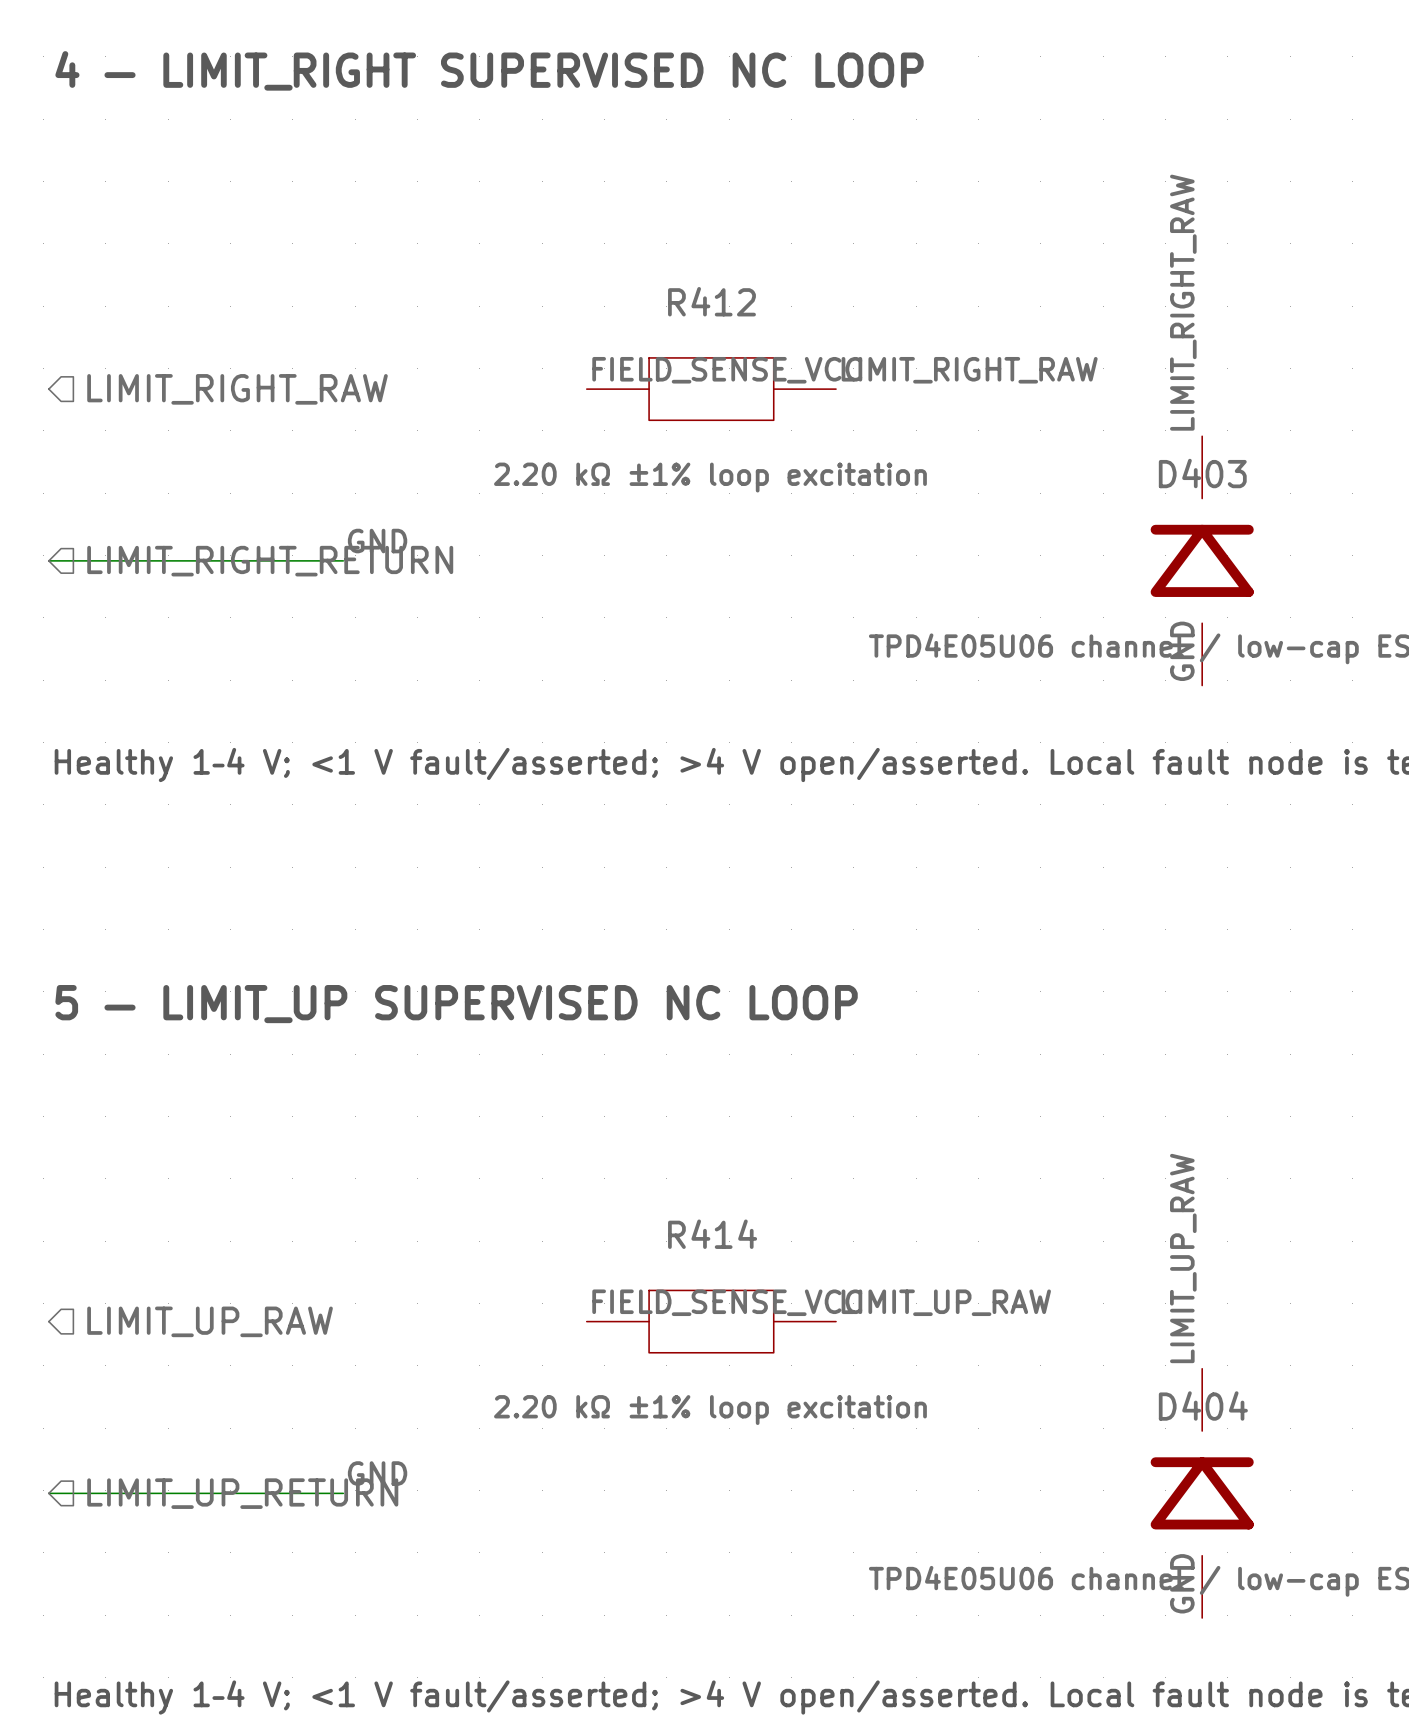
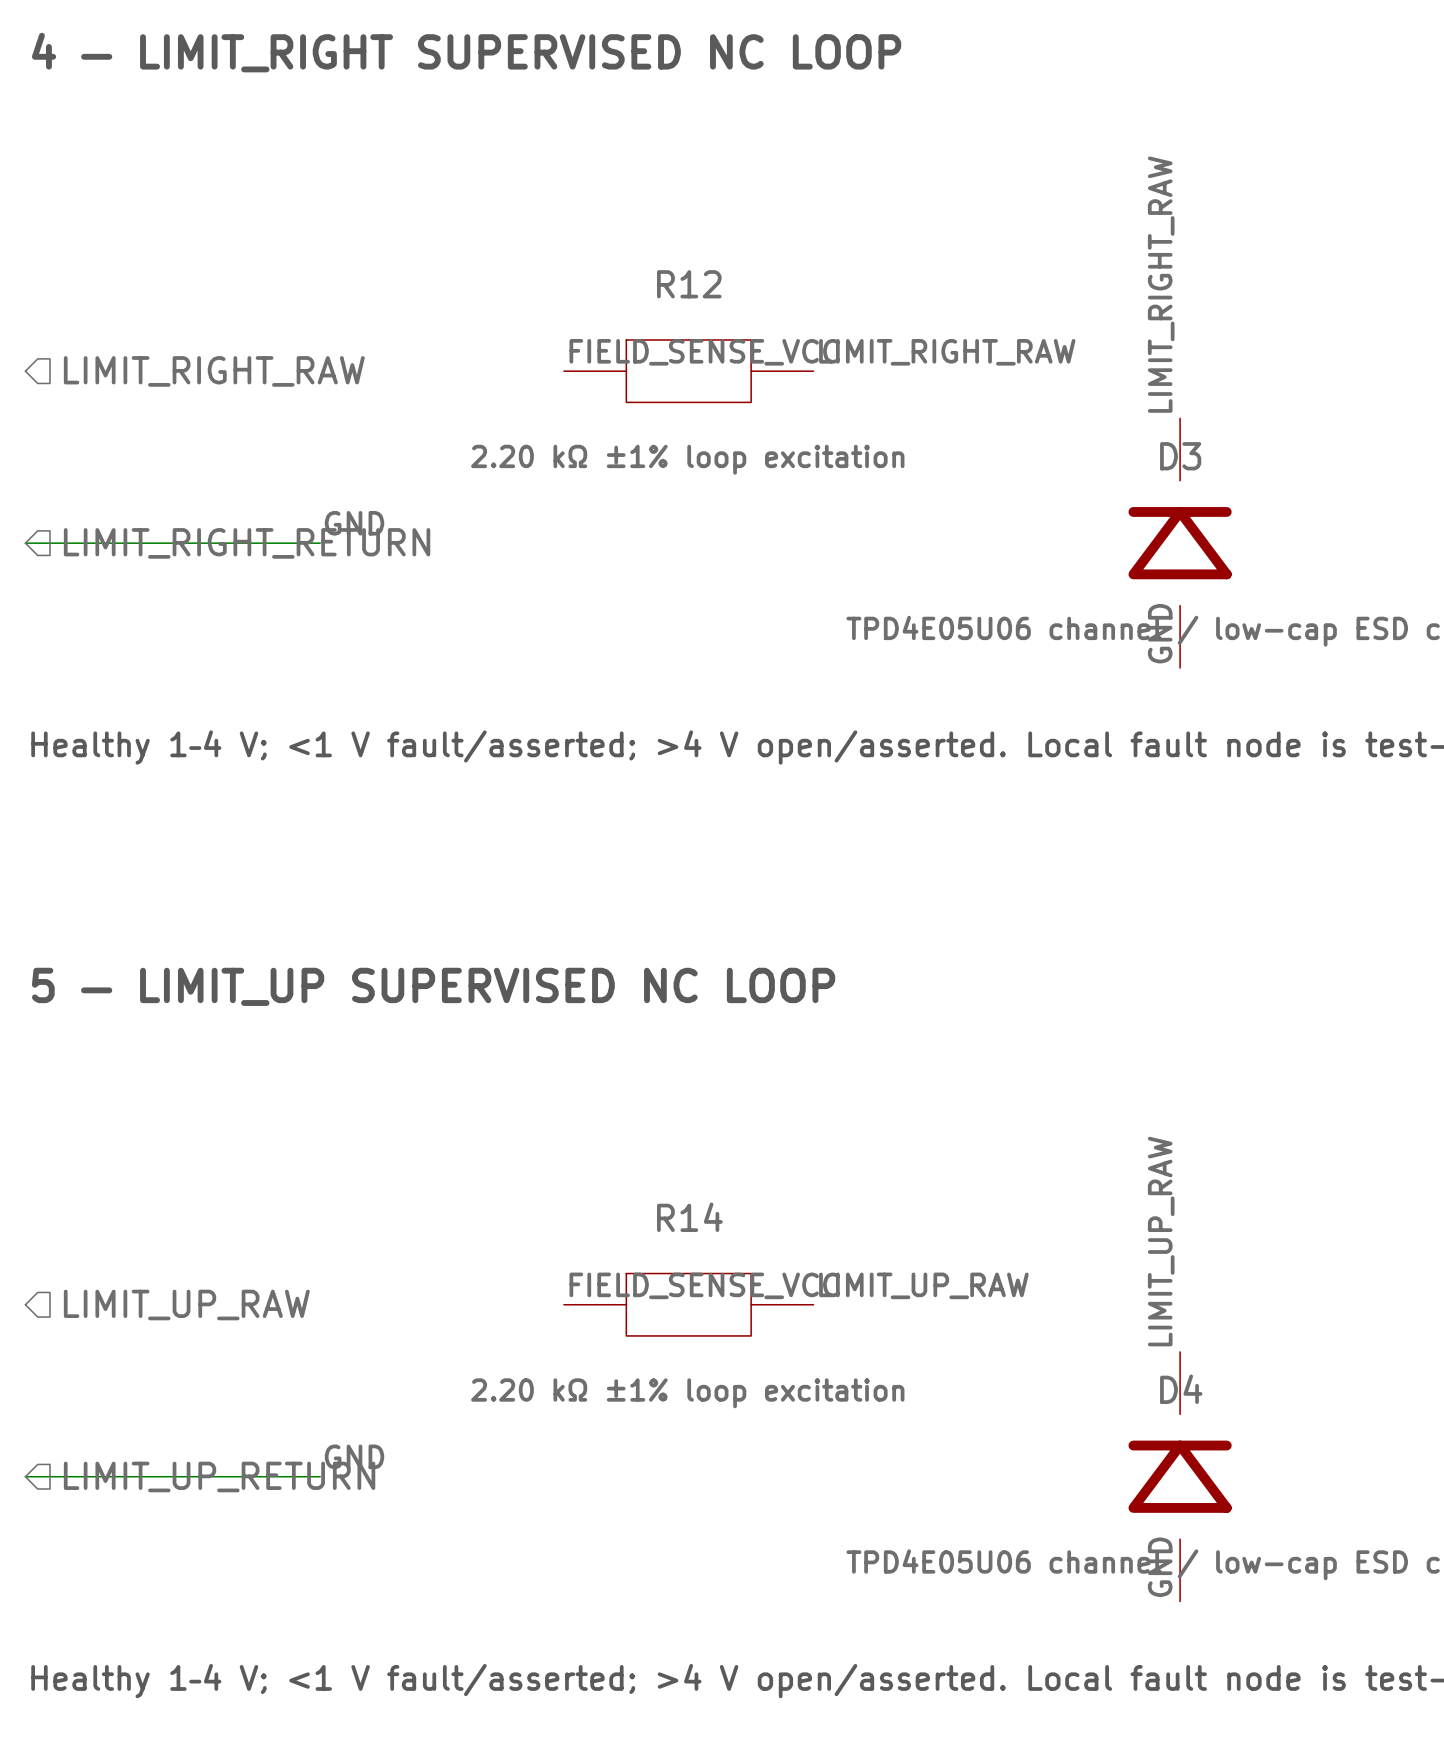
R412 name: R412 (711, 301) -> R12 (689, 284)
D403 name: D403 (1202, 473) -> D3 (1180, 456)
R414 name: R414 (712, 1234) -> R14 (689, 1217)
D404 name: D404 (1203, 1405) -> D4 (1181, 1389)

